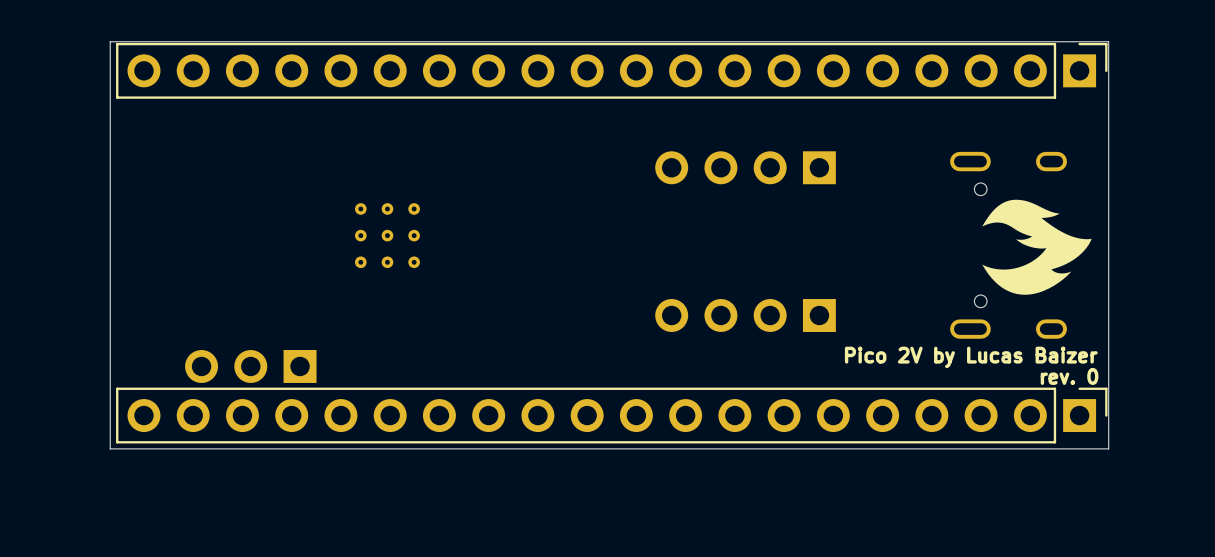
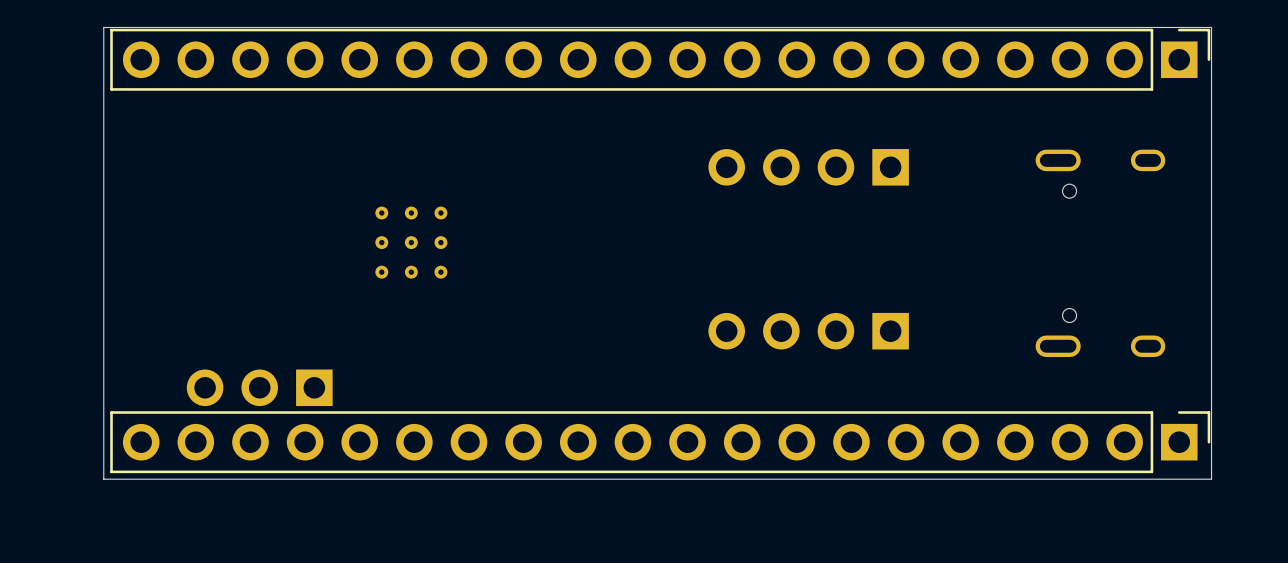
drawing: [982, 199, 1092, 295] -> none
text: Pico 2V by Lucas Baizer (971, 357) -> none
text: rev. 0 (1069, 376) -> none

